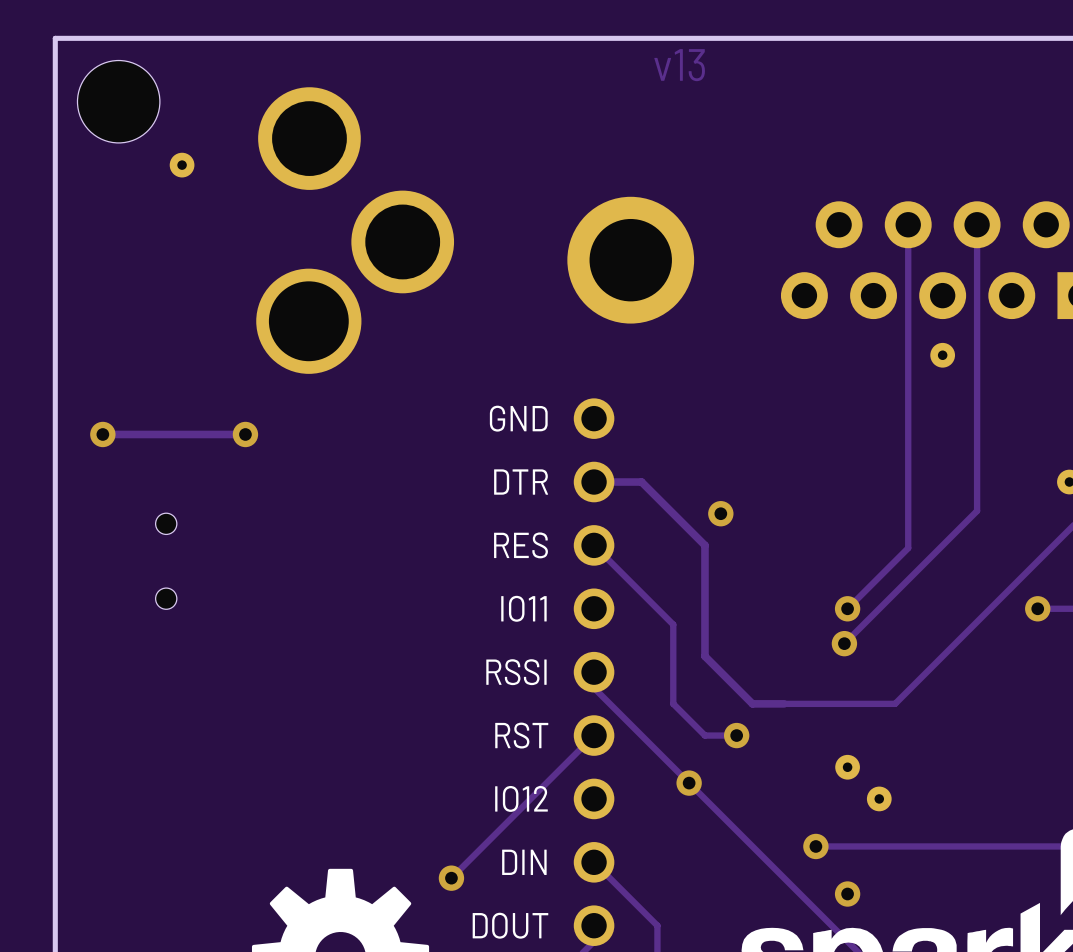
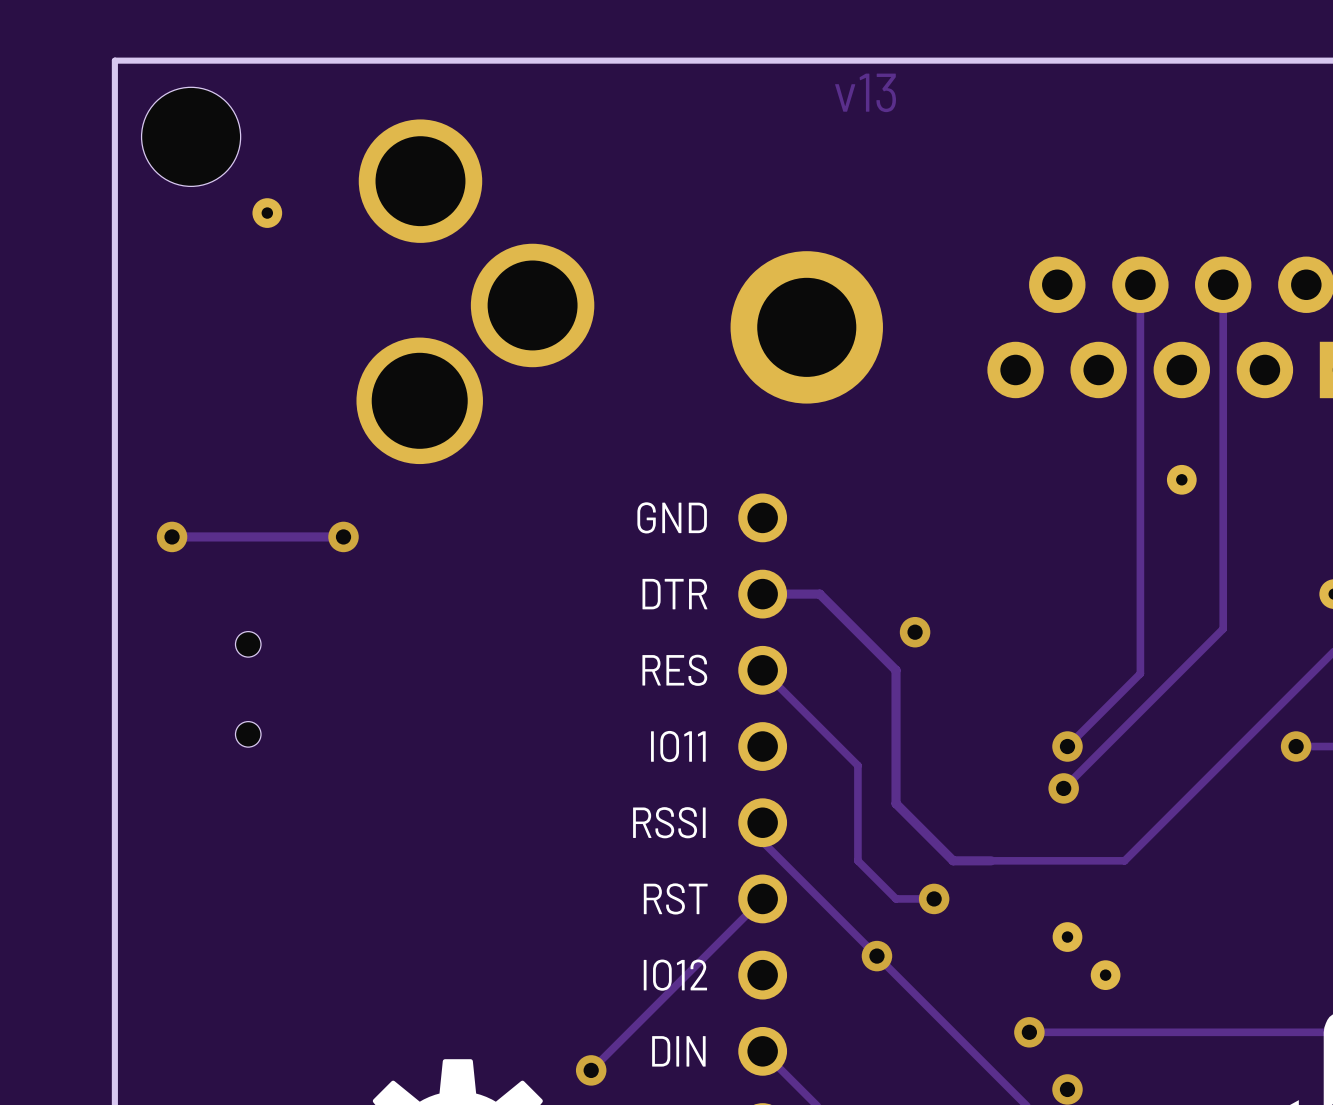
part position: (942, 355) -> (1181, 479)

